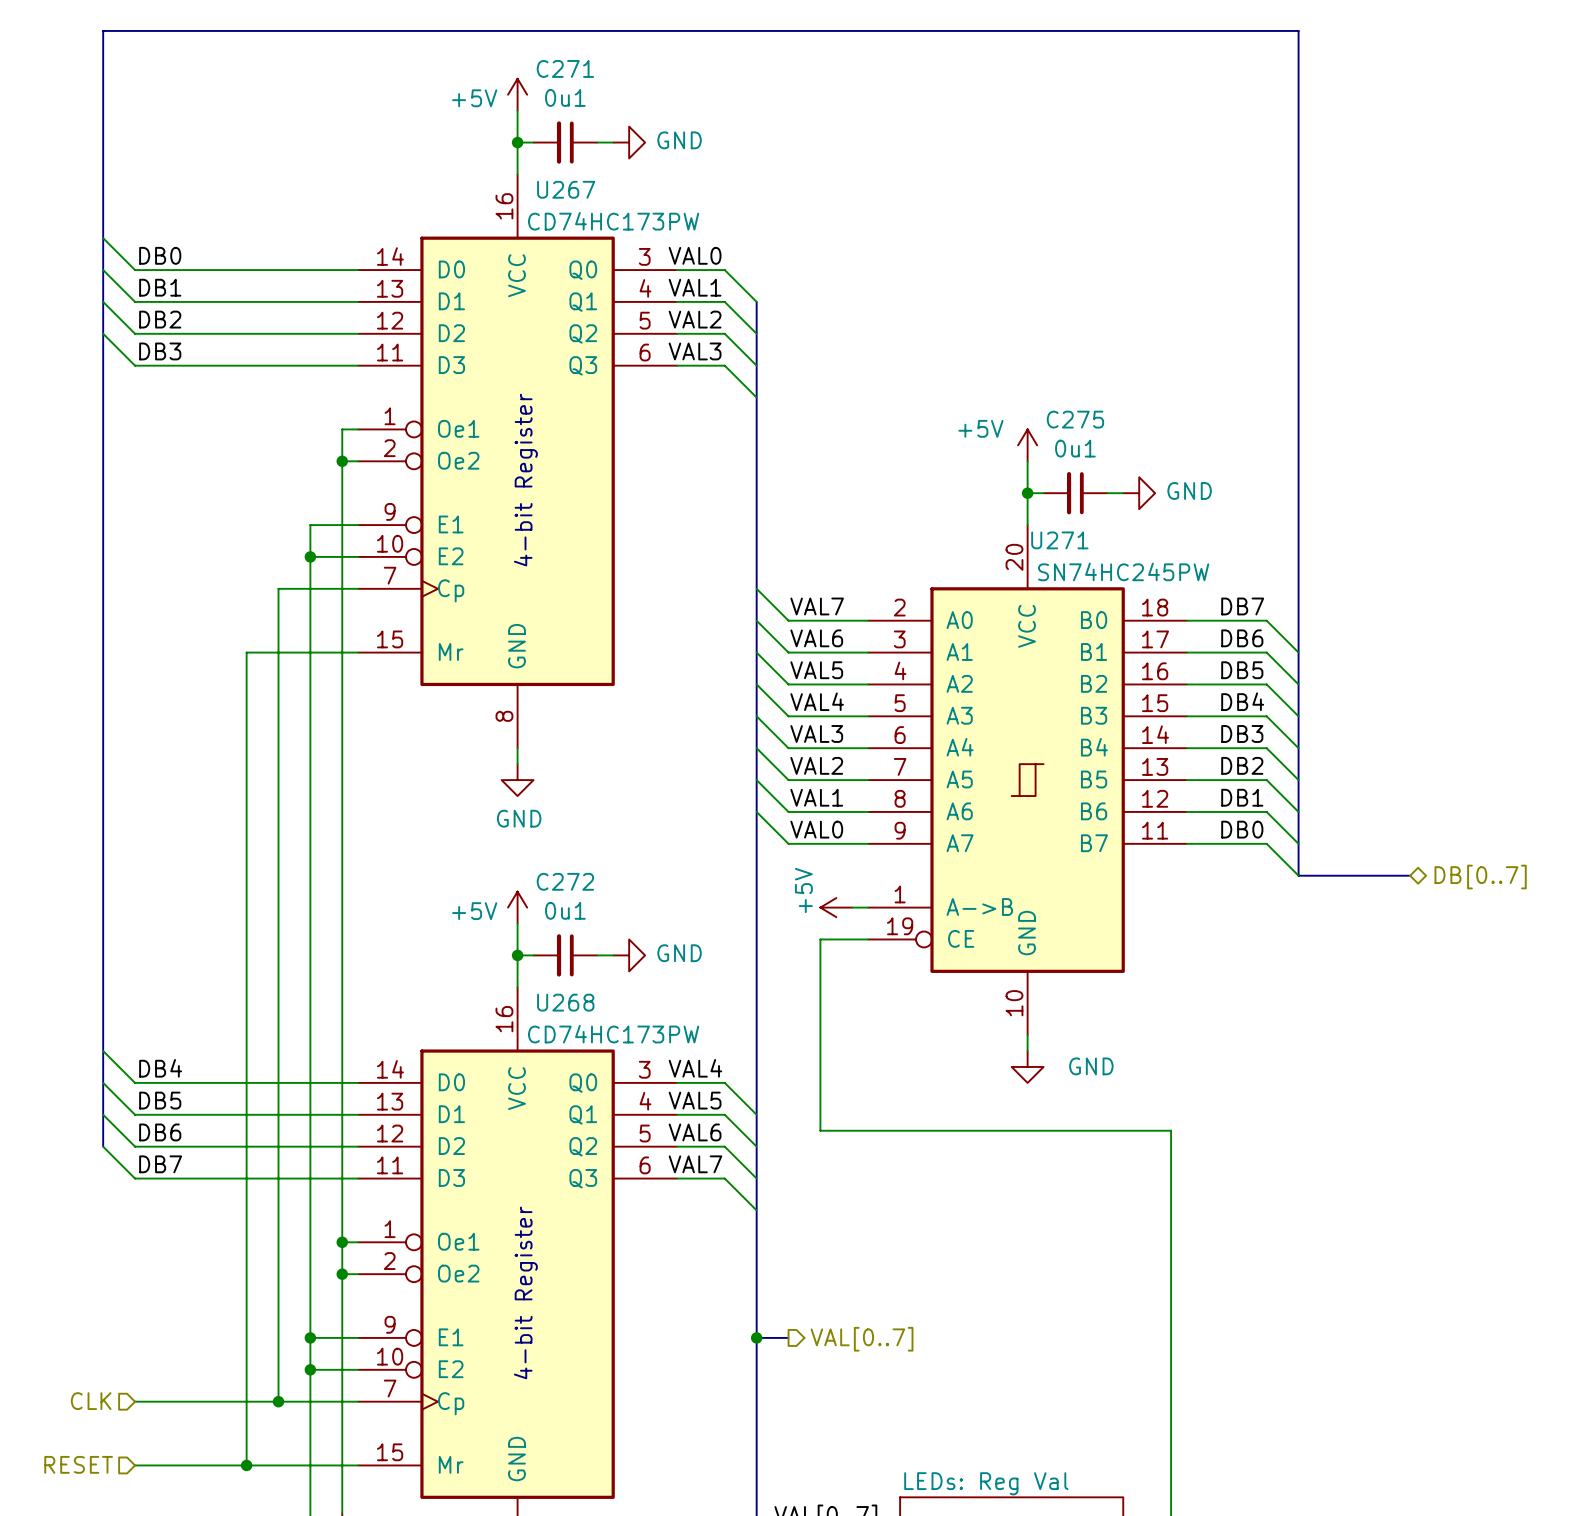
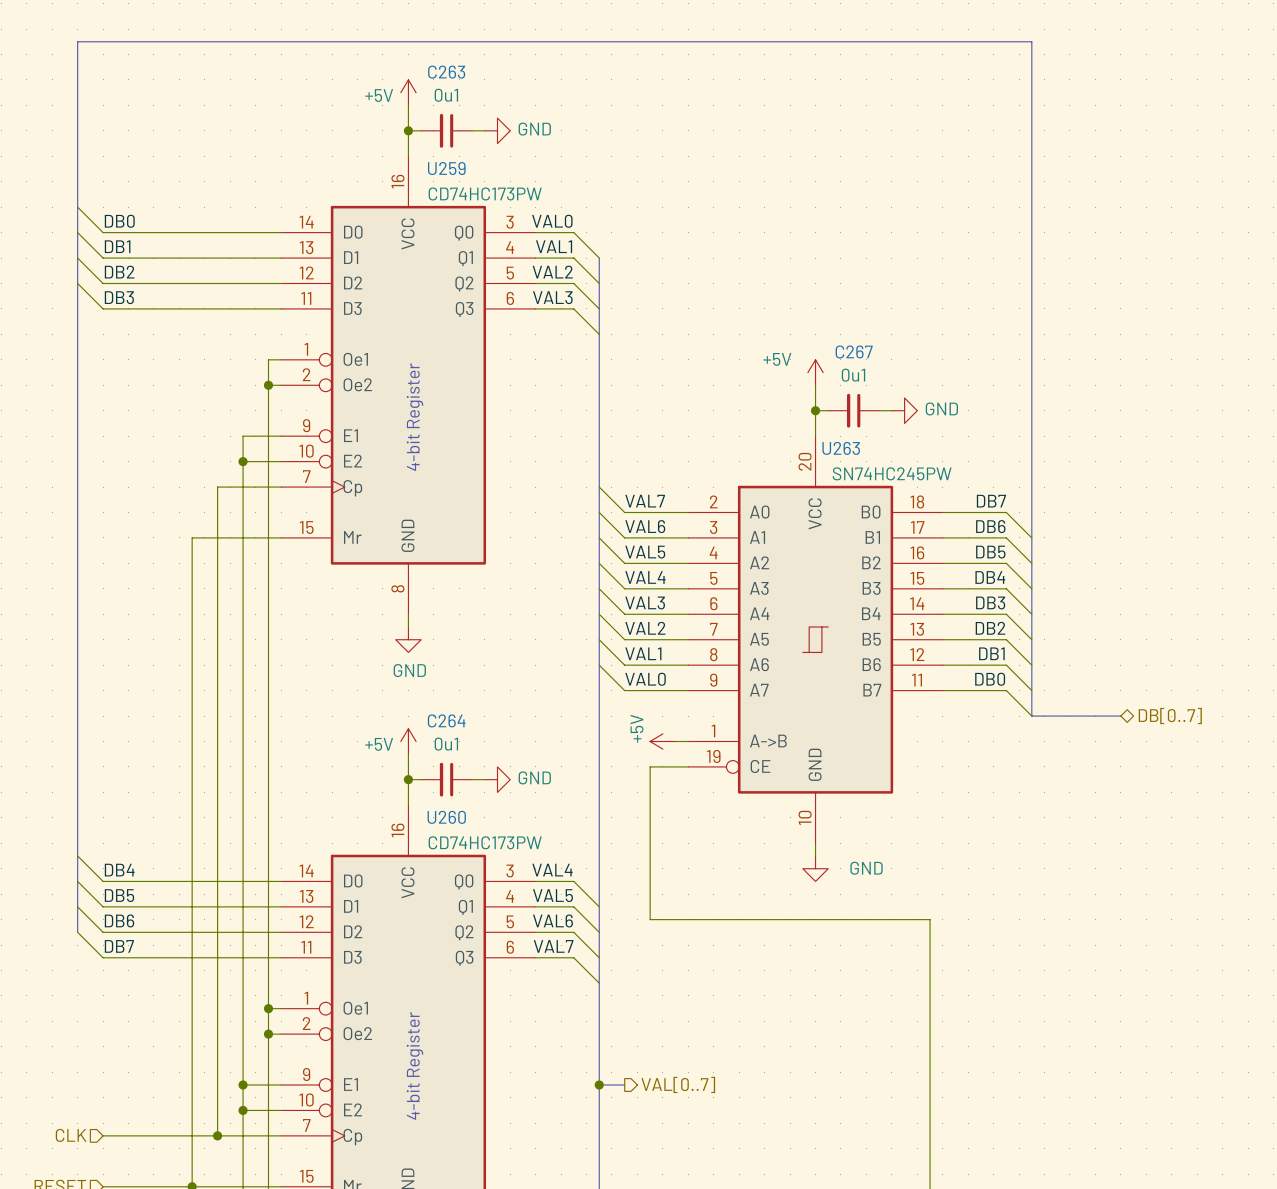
C271 name: C271 (565, 68) -> C263 (446, 72)
U267 name: U267 (566, 189) -> U259 (446, 168)
C275 name: C275 (1075, 419) -> C267 (854, 351)
U271 name: U271 (1059, 540) -> U263 (841, 448)
C272 name: C272 (565, 881) -> C264 (446, 720)
U268 name: U268 (565, 1002) -> U260 (446, 817)

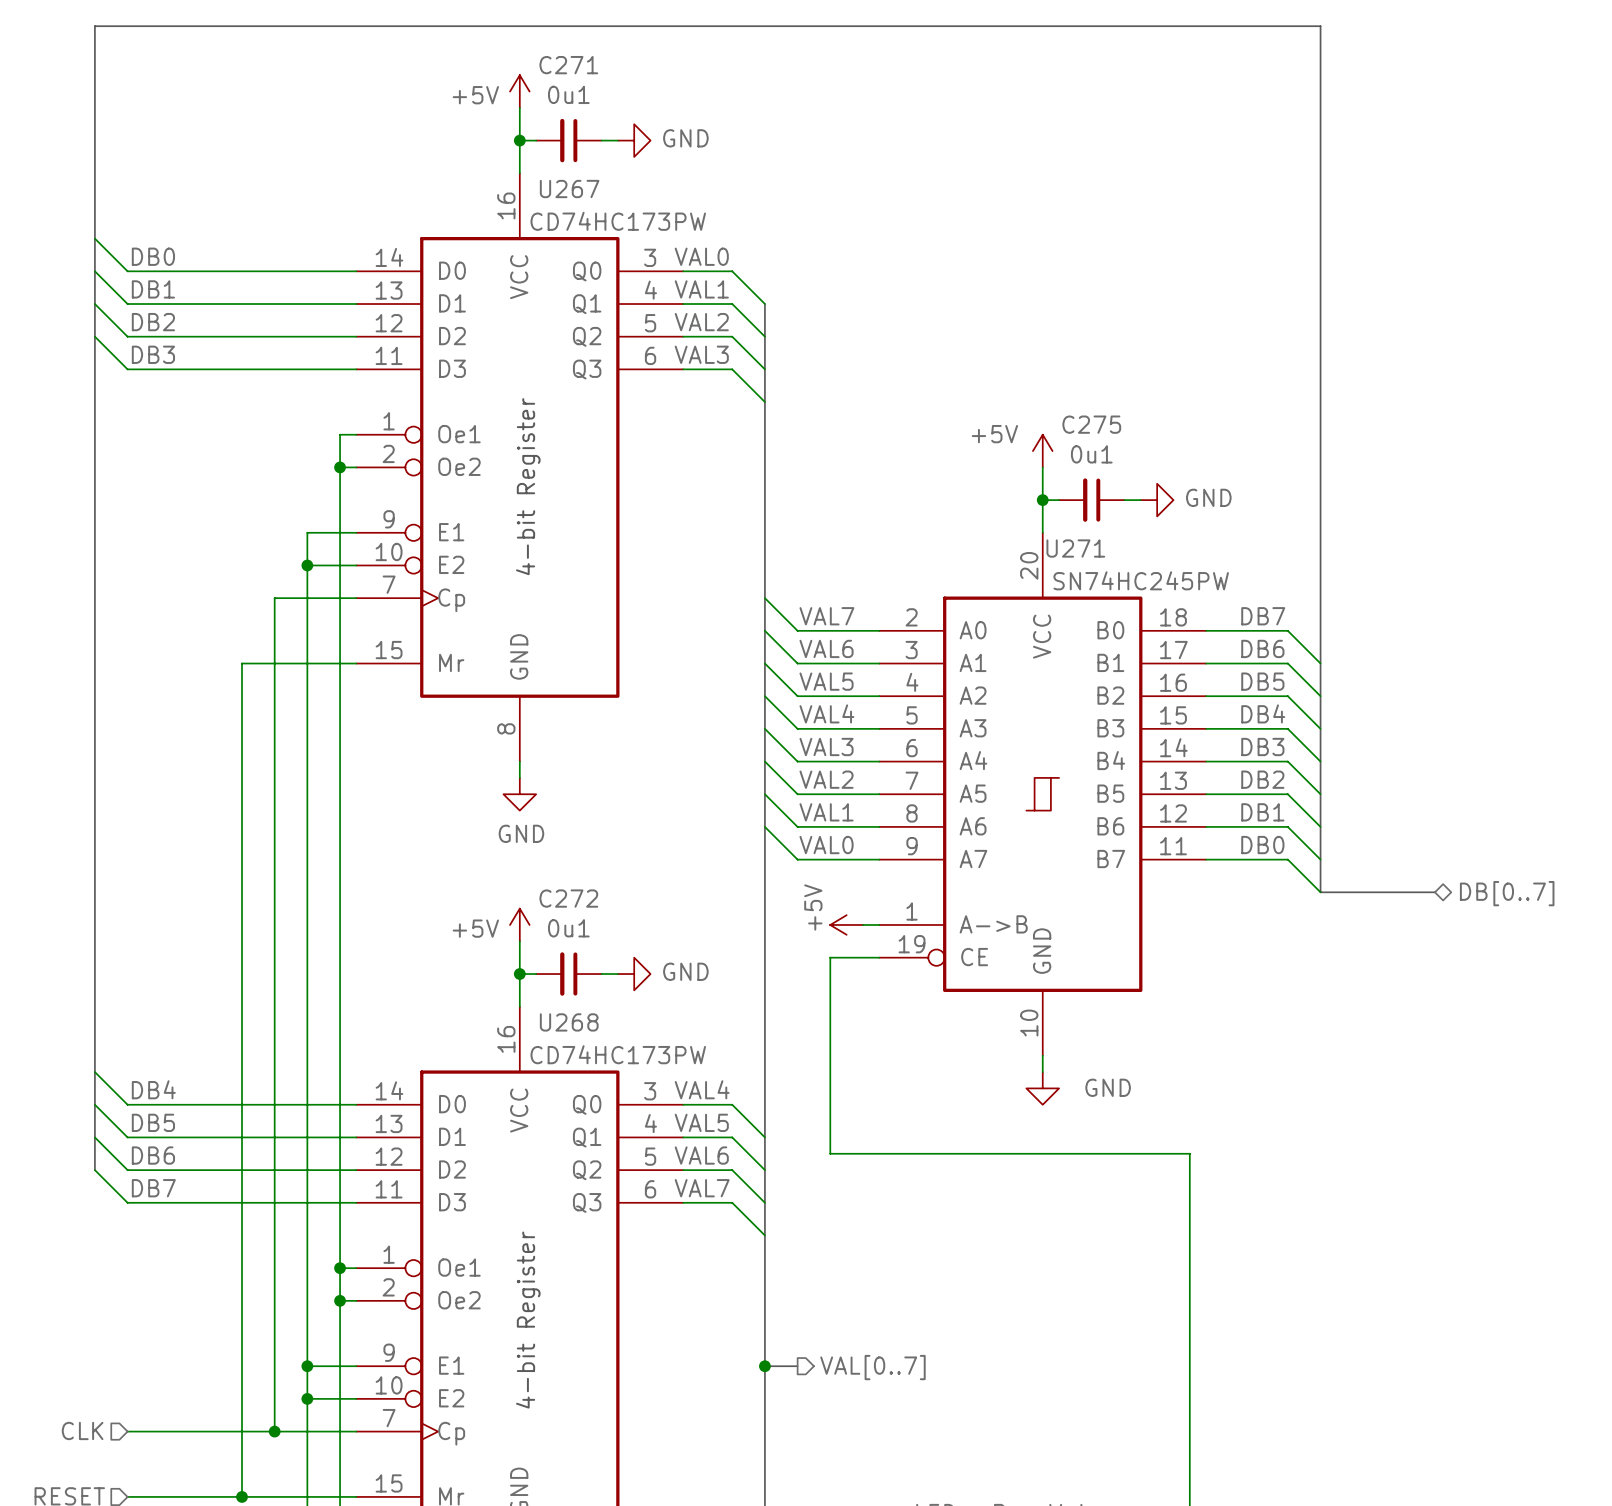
C263 name: C263 (446, 72) -> C271 (568, 65)
U259 name: U259 (446, 168) -> U267 (569, 189)
C267 name: C267 (854, 351) -> C275 (1091, 424)
U263 name: U263 (841, 448) -> U271 (1075, 548)
C264 name: C264 (446, 720) -> C272 (568, 898)
U260 name: U260 (446, 817) -> U268 (569, 1022)

